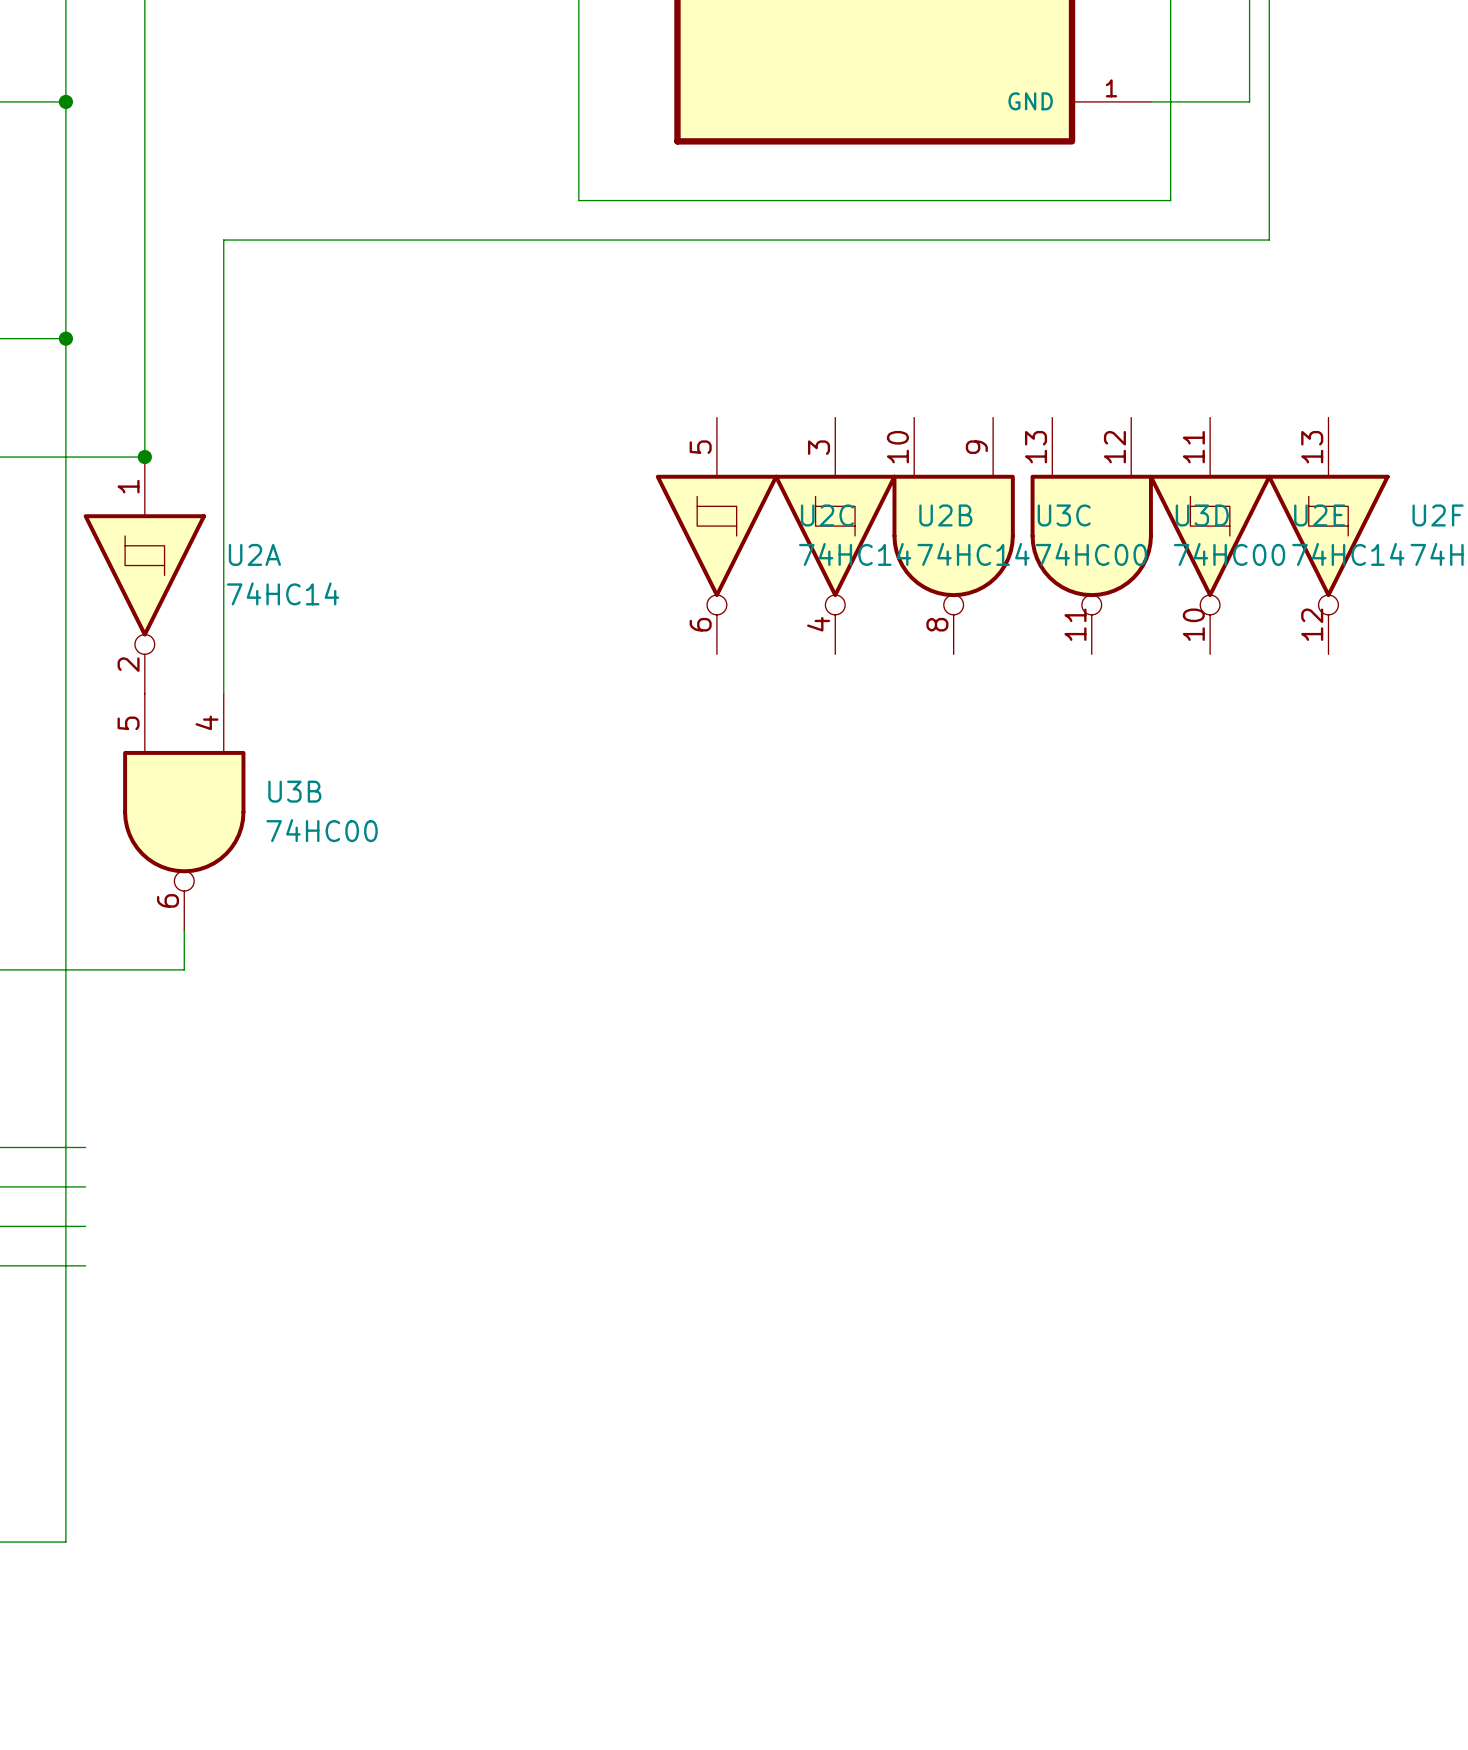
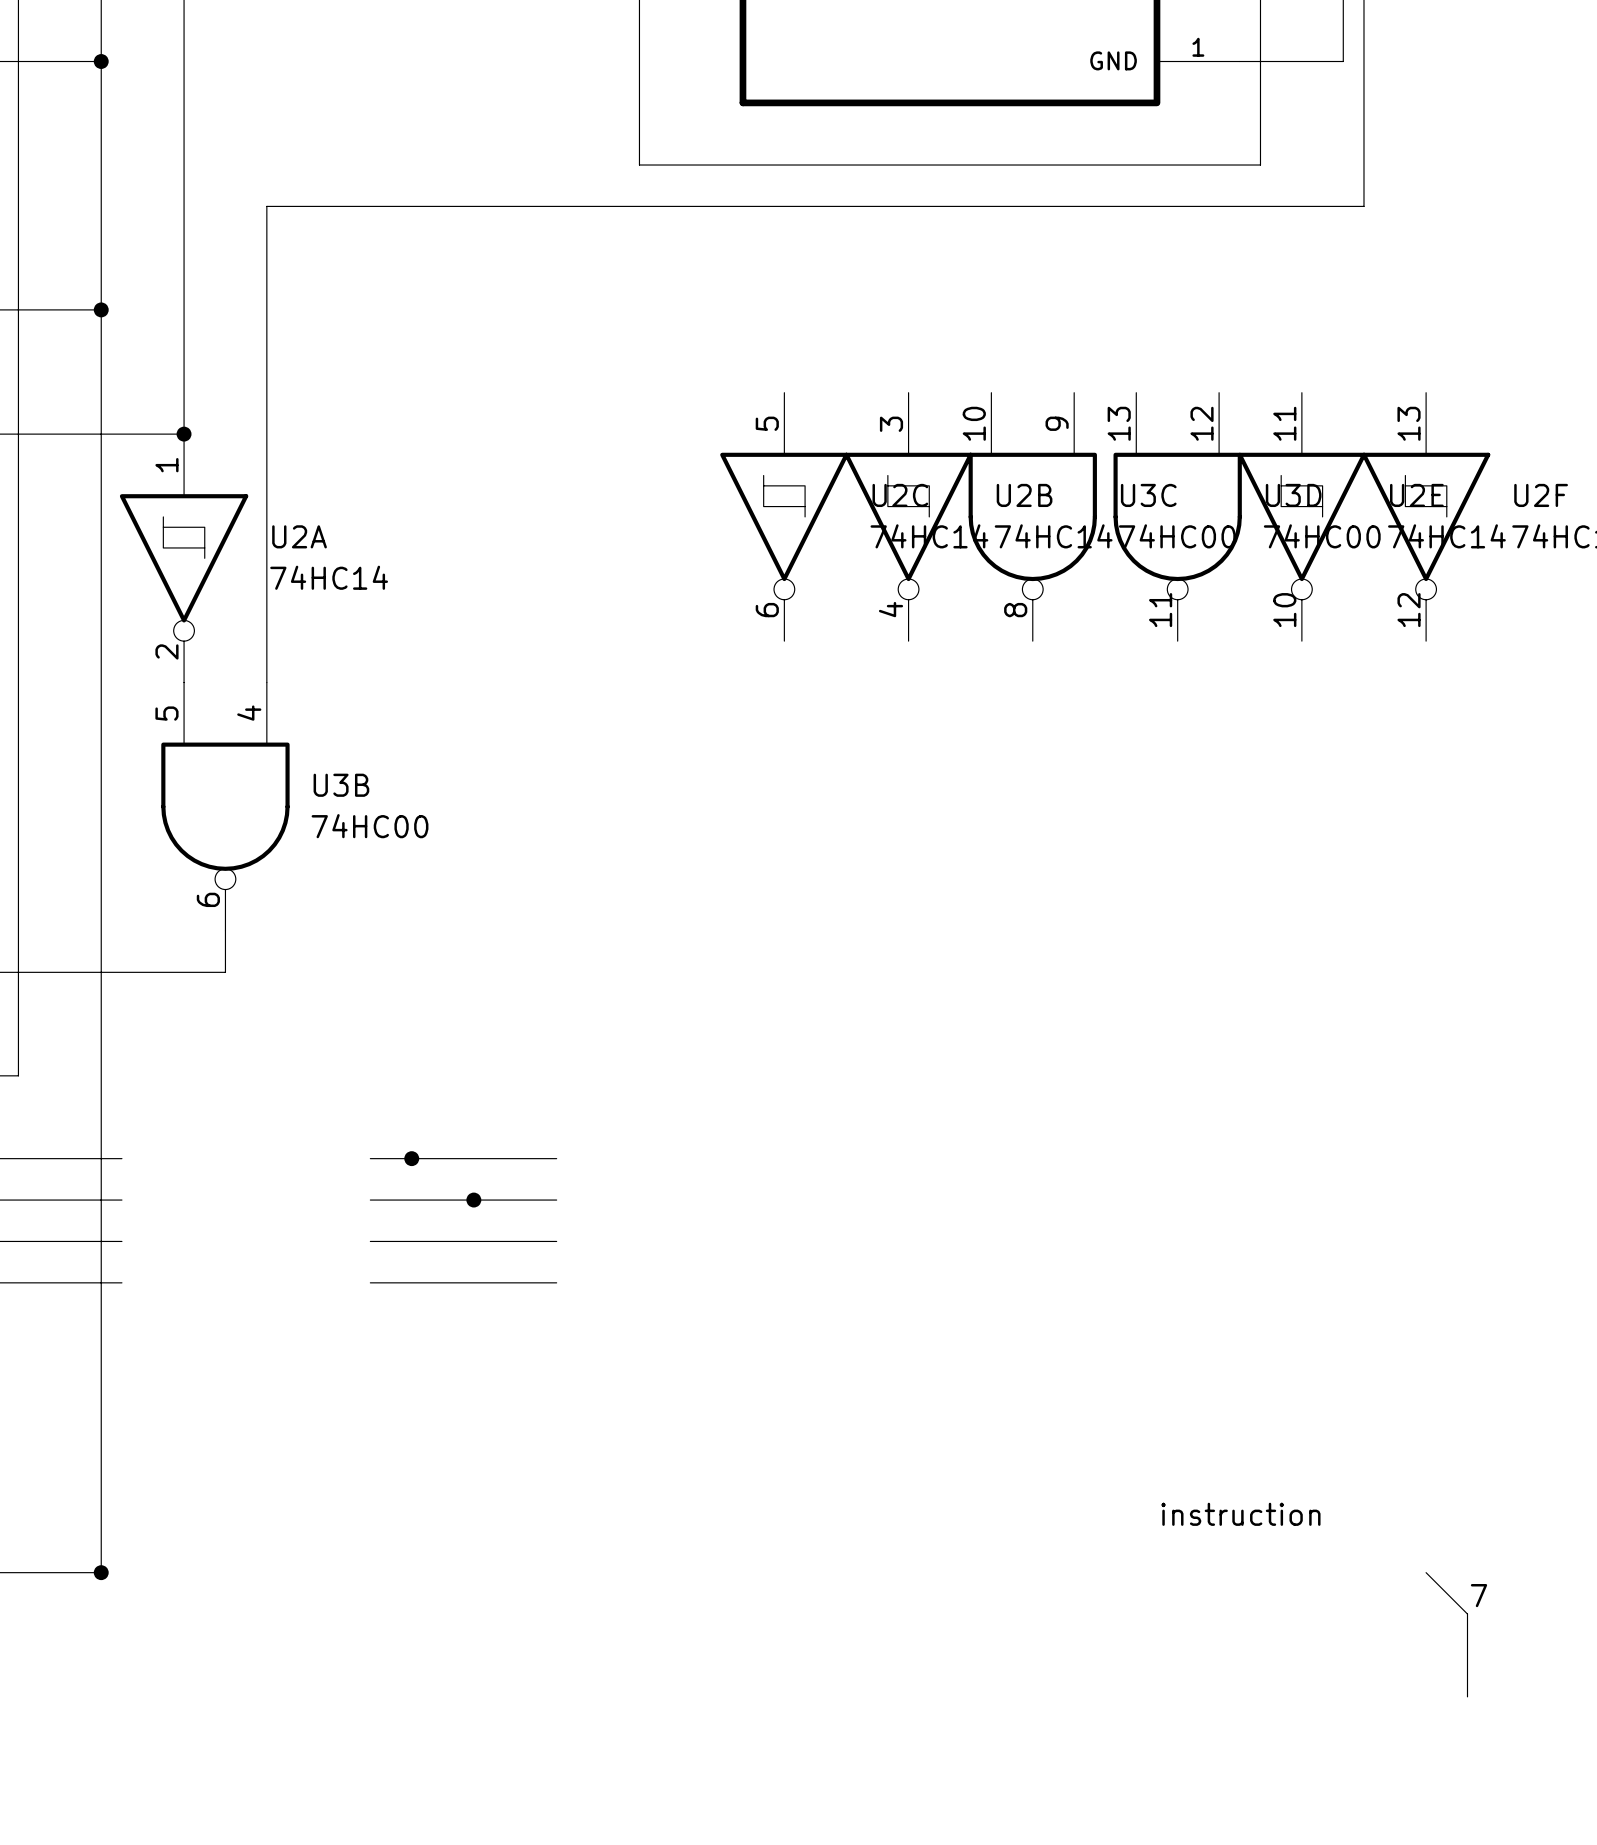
wire: none -> (370, 1158) (556, 1158)
junction: none -> (411, 1158)
wire: none -> (370, 1200) (556, 1200)
junction: none -> (473, 1200)
wire: none -> (370, 1241) (556, 1241)
wire: none -> (370, 1282) (556, 1282)
text: none -> instruction (1240, 1514)
junction: none -> (101, 1572)
wire: none -> (1426, 1572) (1467, 1614) (1467, 1696)
label: none -> 7 (1478, 1595)

